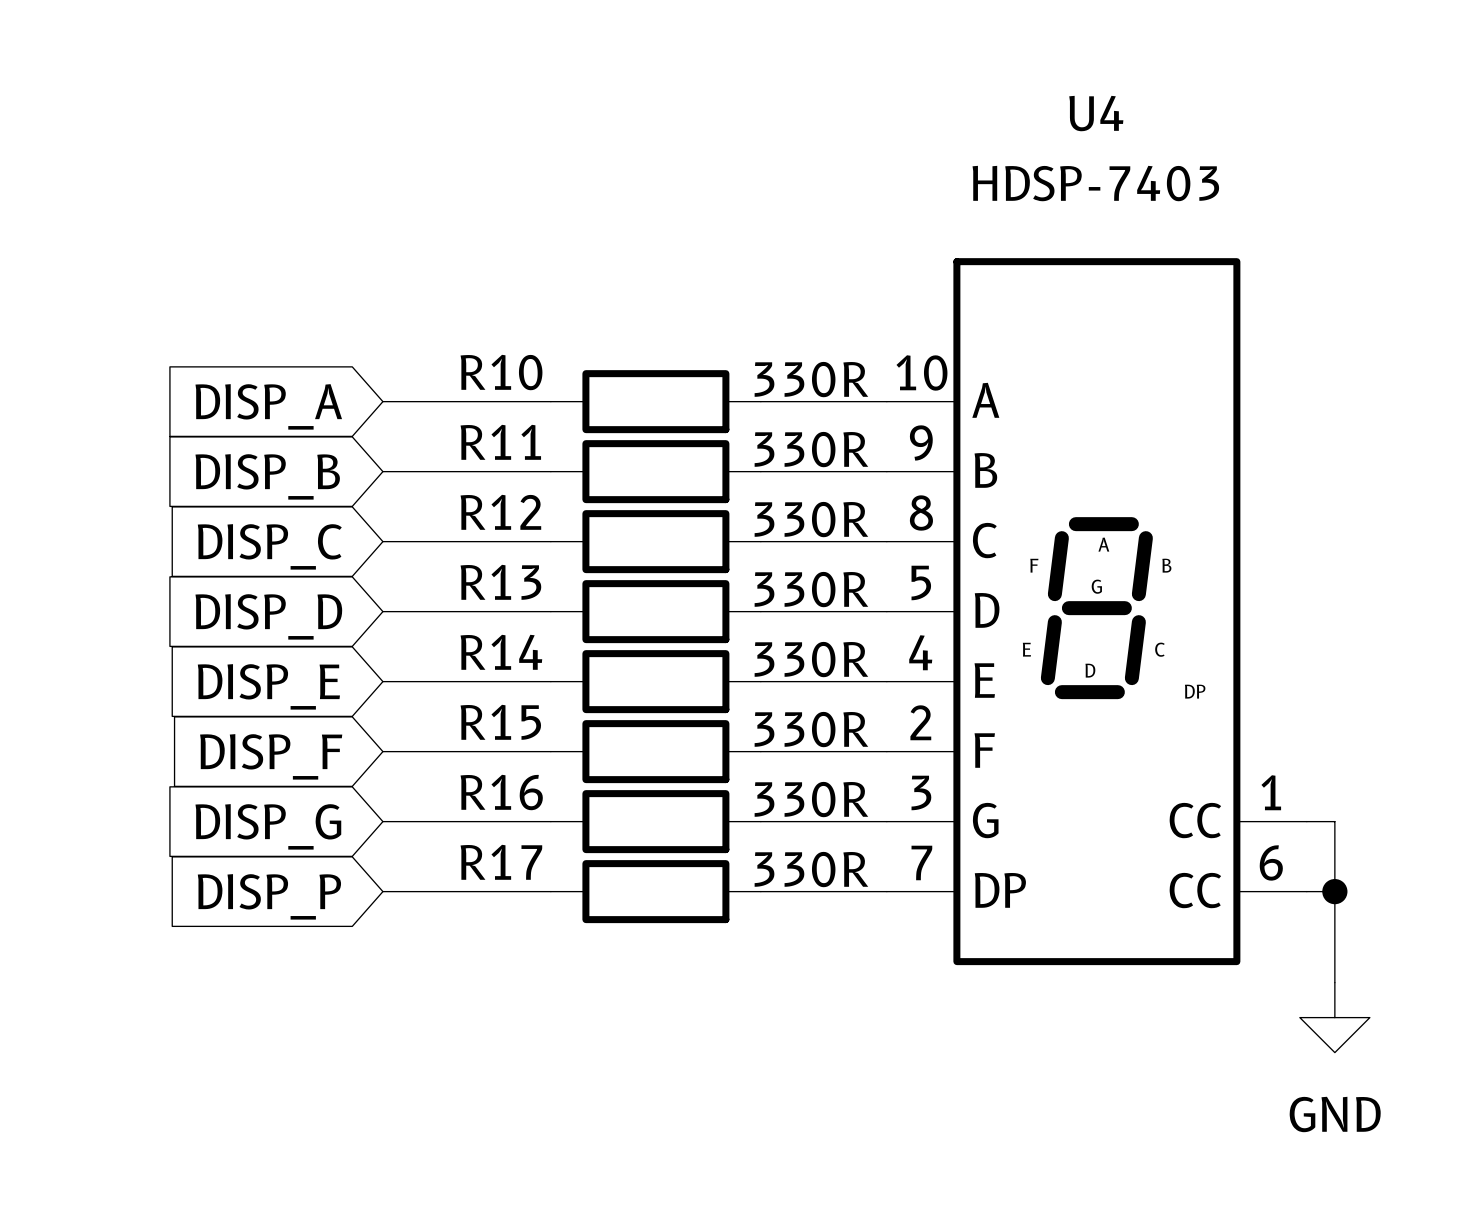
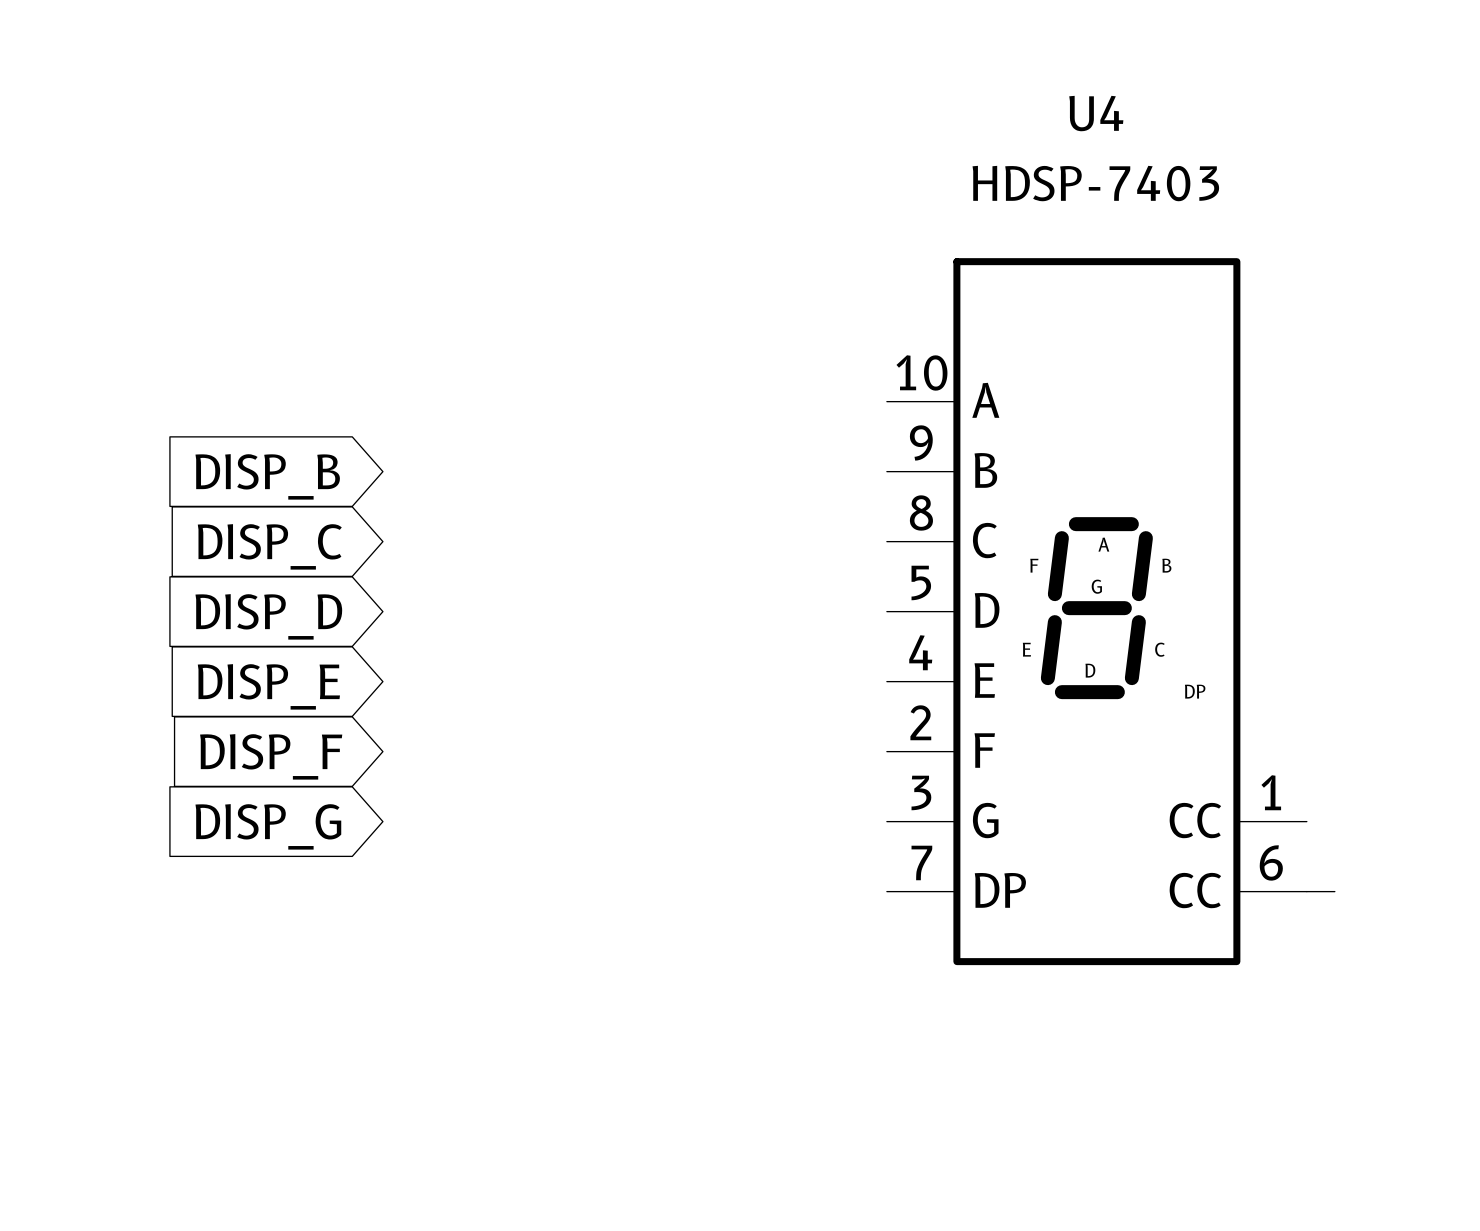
wire: (382, 401) (550, 401) -> none
R10: 330R (655, 401) -> none
wire: (760, 401) (886, 401) -> none
global label: DISP_A (268, 406) -> none
wire: (382, 471) (550, 471) -> none
R11: 330R (655, 471) -> none
wire: (760, 471) (886, 471) -> none
wire: (382, 541) (550, 541) -> none
R12: 330R (655, 541) -> none
wire: (760, 541) (886, 541) -> none
wire: (382, 611) (550, 611) -> none
R13: 330R (655, 611) -> none
wire: (760, 611) (886, 611) -> none
wire: (382, 681) (550, 681) -> none
R14: 330R (655, 681) -> none
wire: (760, 681) (886, 681) -> none
wire: (382, 751) (550, 751) -> none
R15: 330R (655, 751) -> none
wire: (760, 751) (886, 751) -> none
wire: (382, 821) (550, 821) -> none
R16: 330R (655, 821) -> none
wire: (760, 821) (886, 821) -> none
wire: (1306, 821) (1334, 821) (1334, 982) -> none
wire: (382, 891) (550, 891) -> none
R17: 330R (655, 891) -> none
wire: (760, 891) (886, 891) -> none
junction: (1334, 891) -> none
global label: DISP_P (269, 896) -> none
power symbol: GND (1334, 1017) -> none

